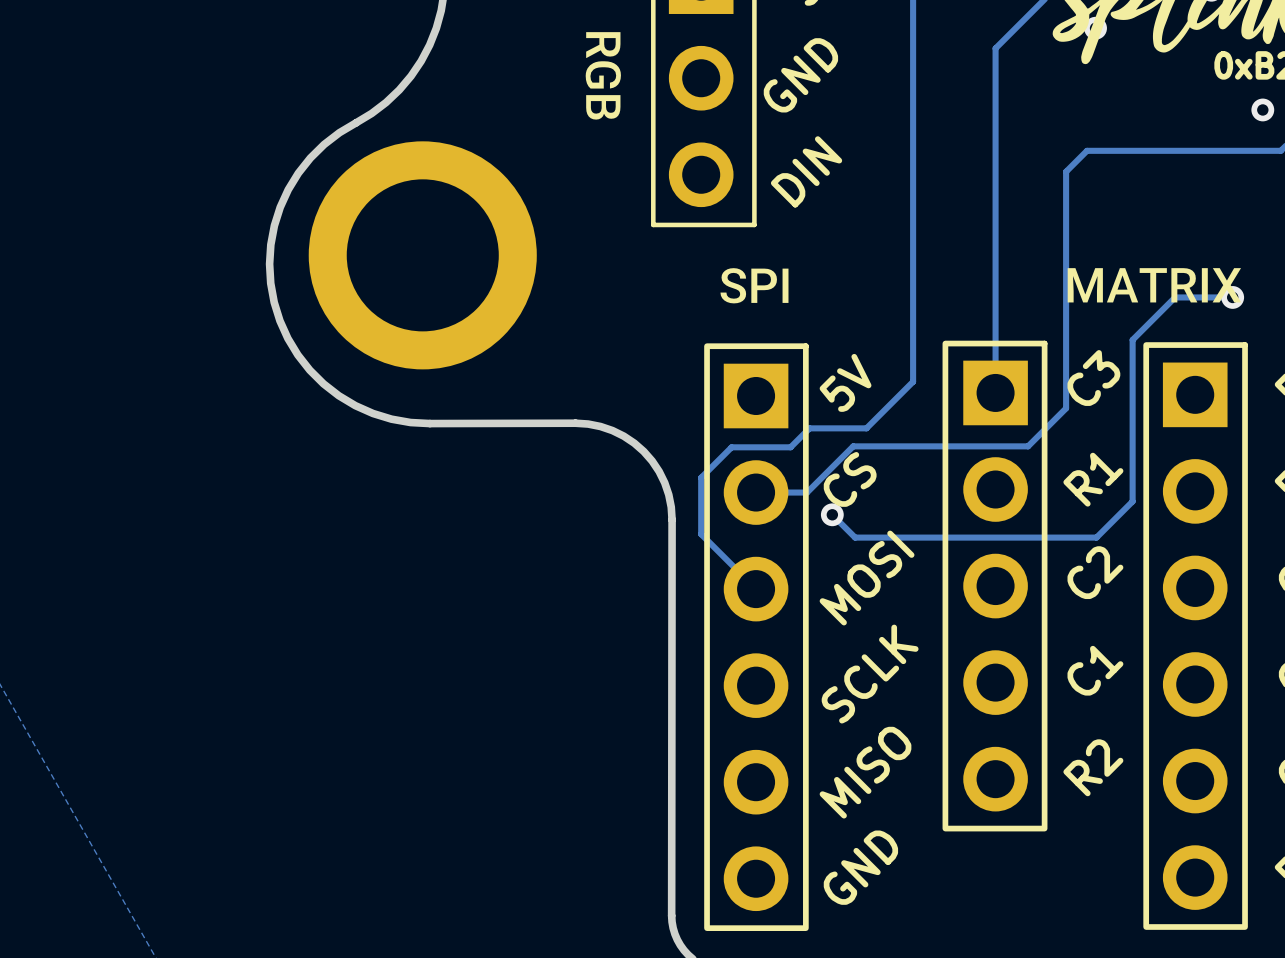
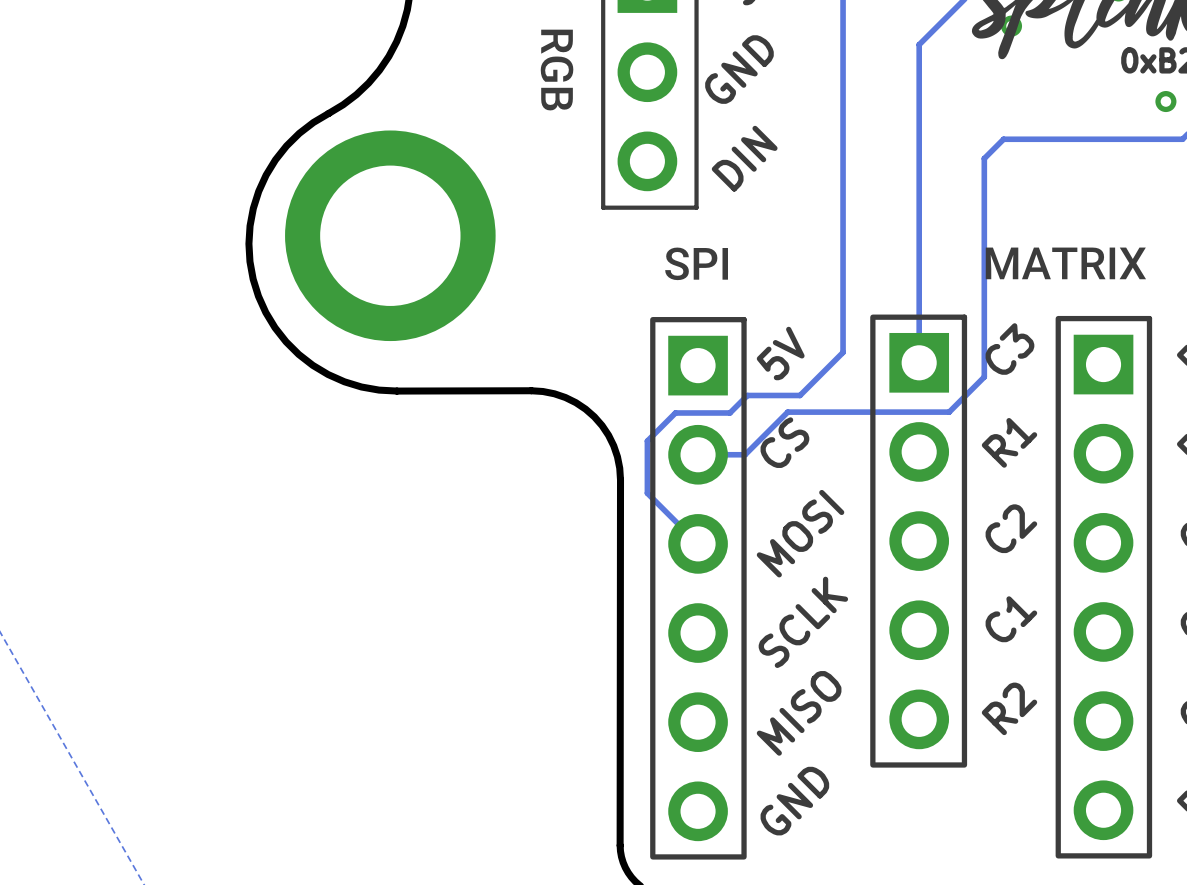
track: (1232, 297) (1175, 297) (1132, 339) (1132, 501) (1096, 537) (855, 537) (832, 514) -> none
via: (1232, 297) -> none
via: (832, 514) -> none

